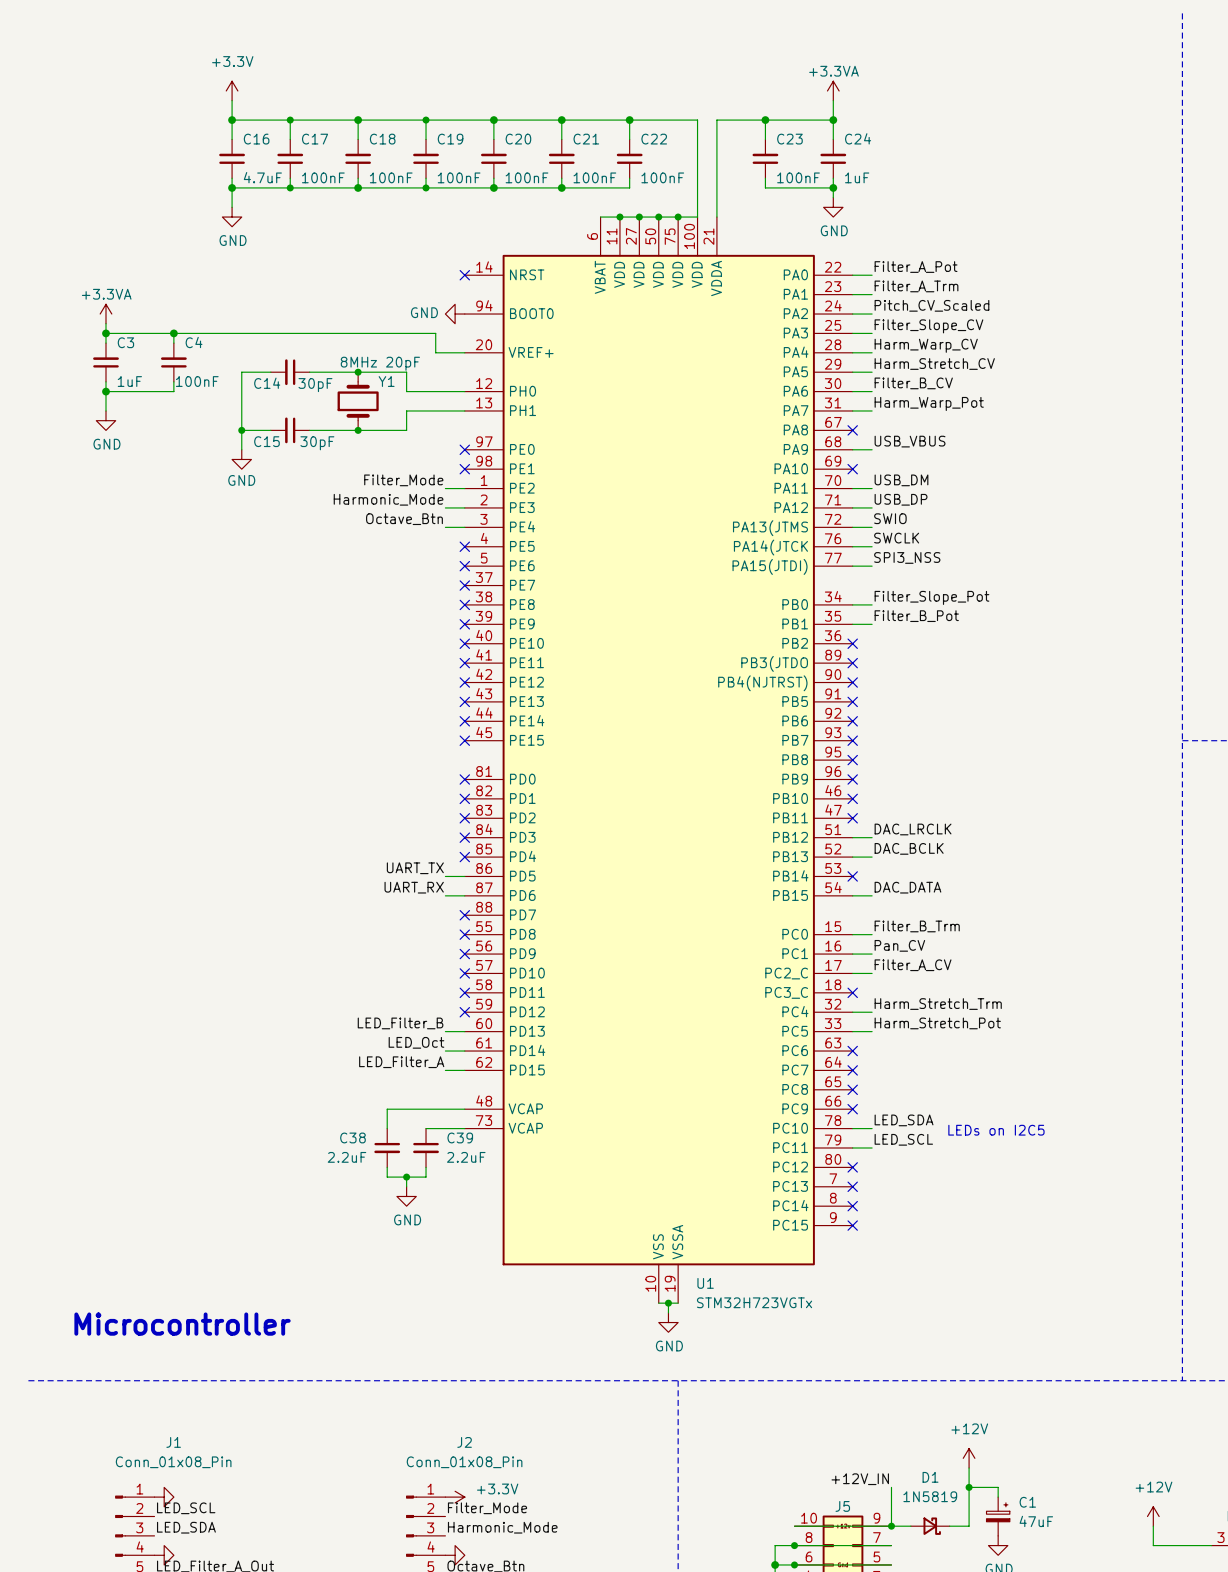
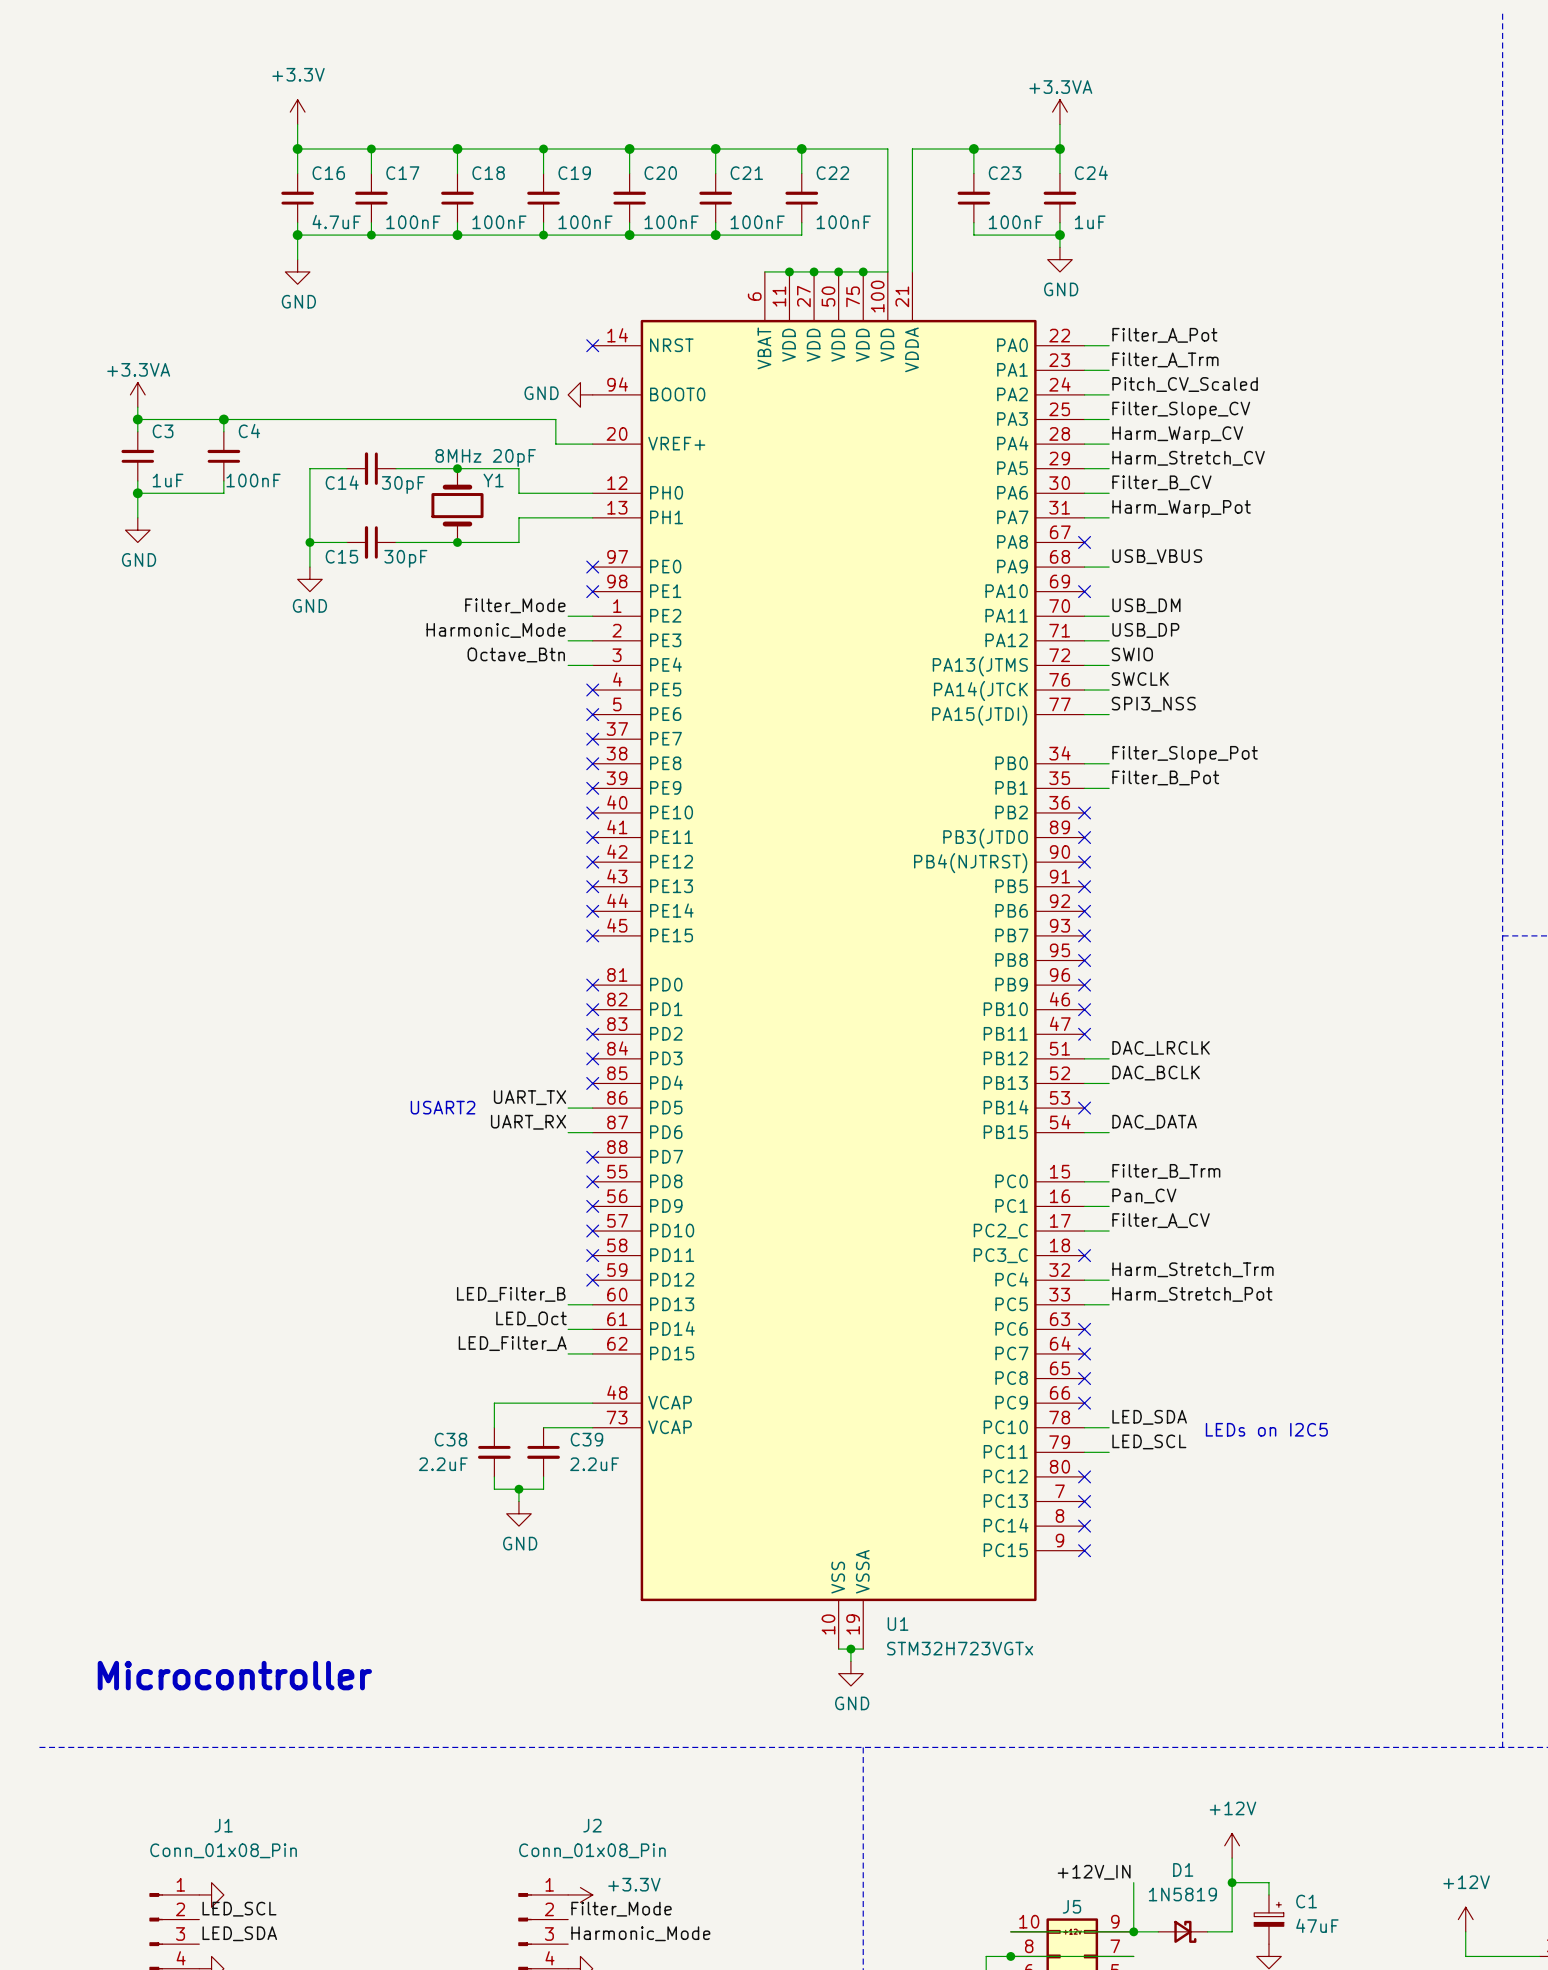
text: none -> USART2 (443, 1107)

